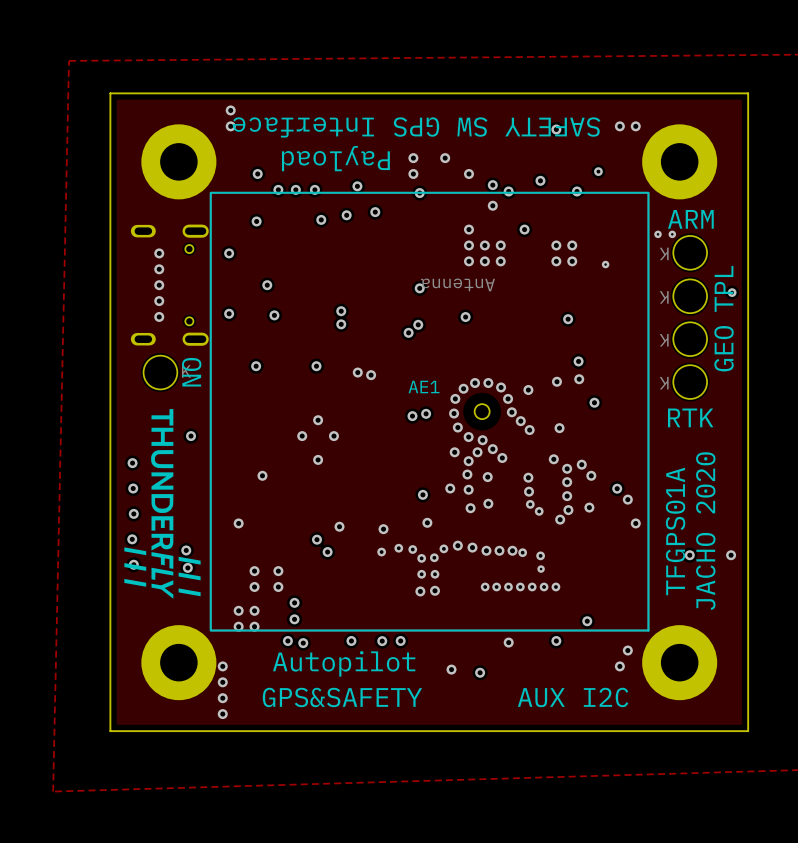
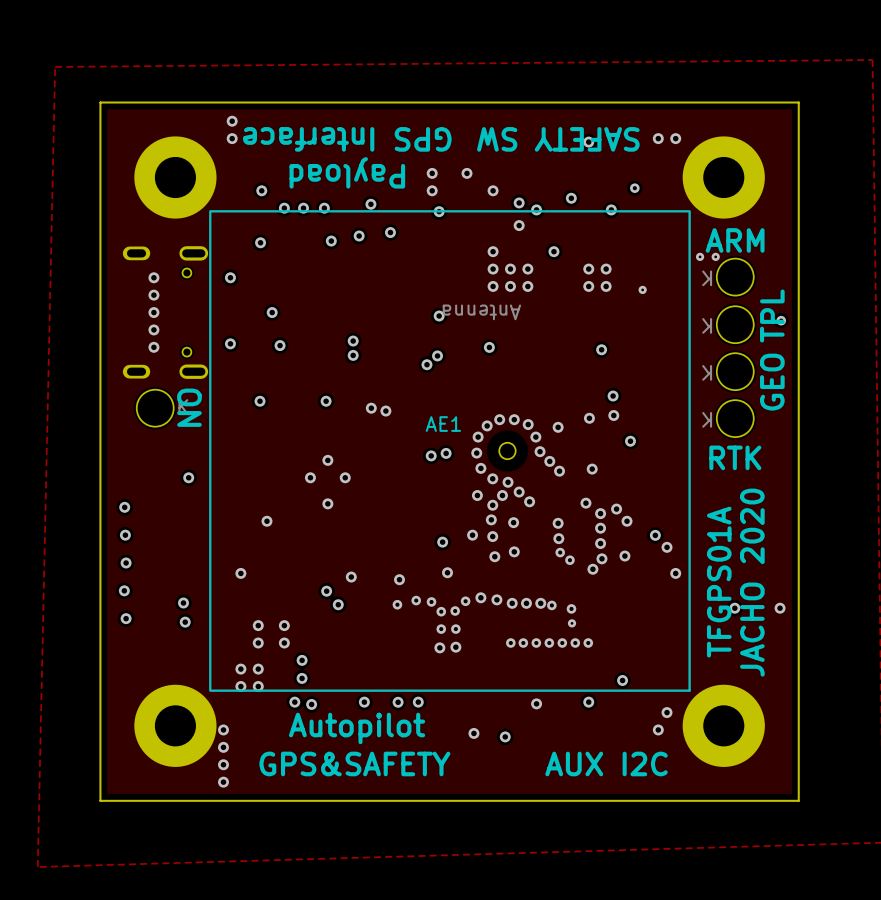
drawing: [124, 409, 201, 599] -> none

